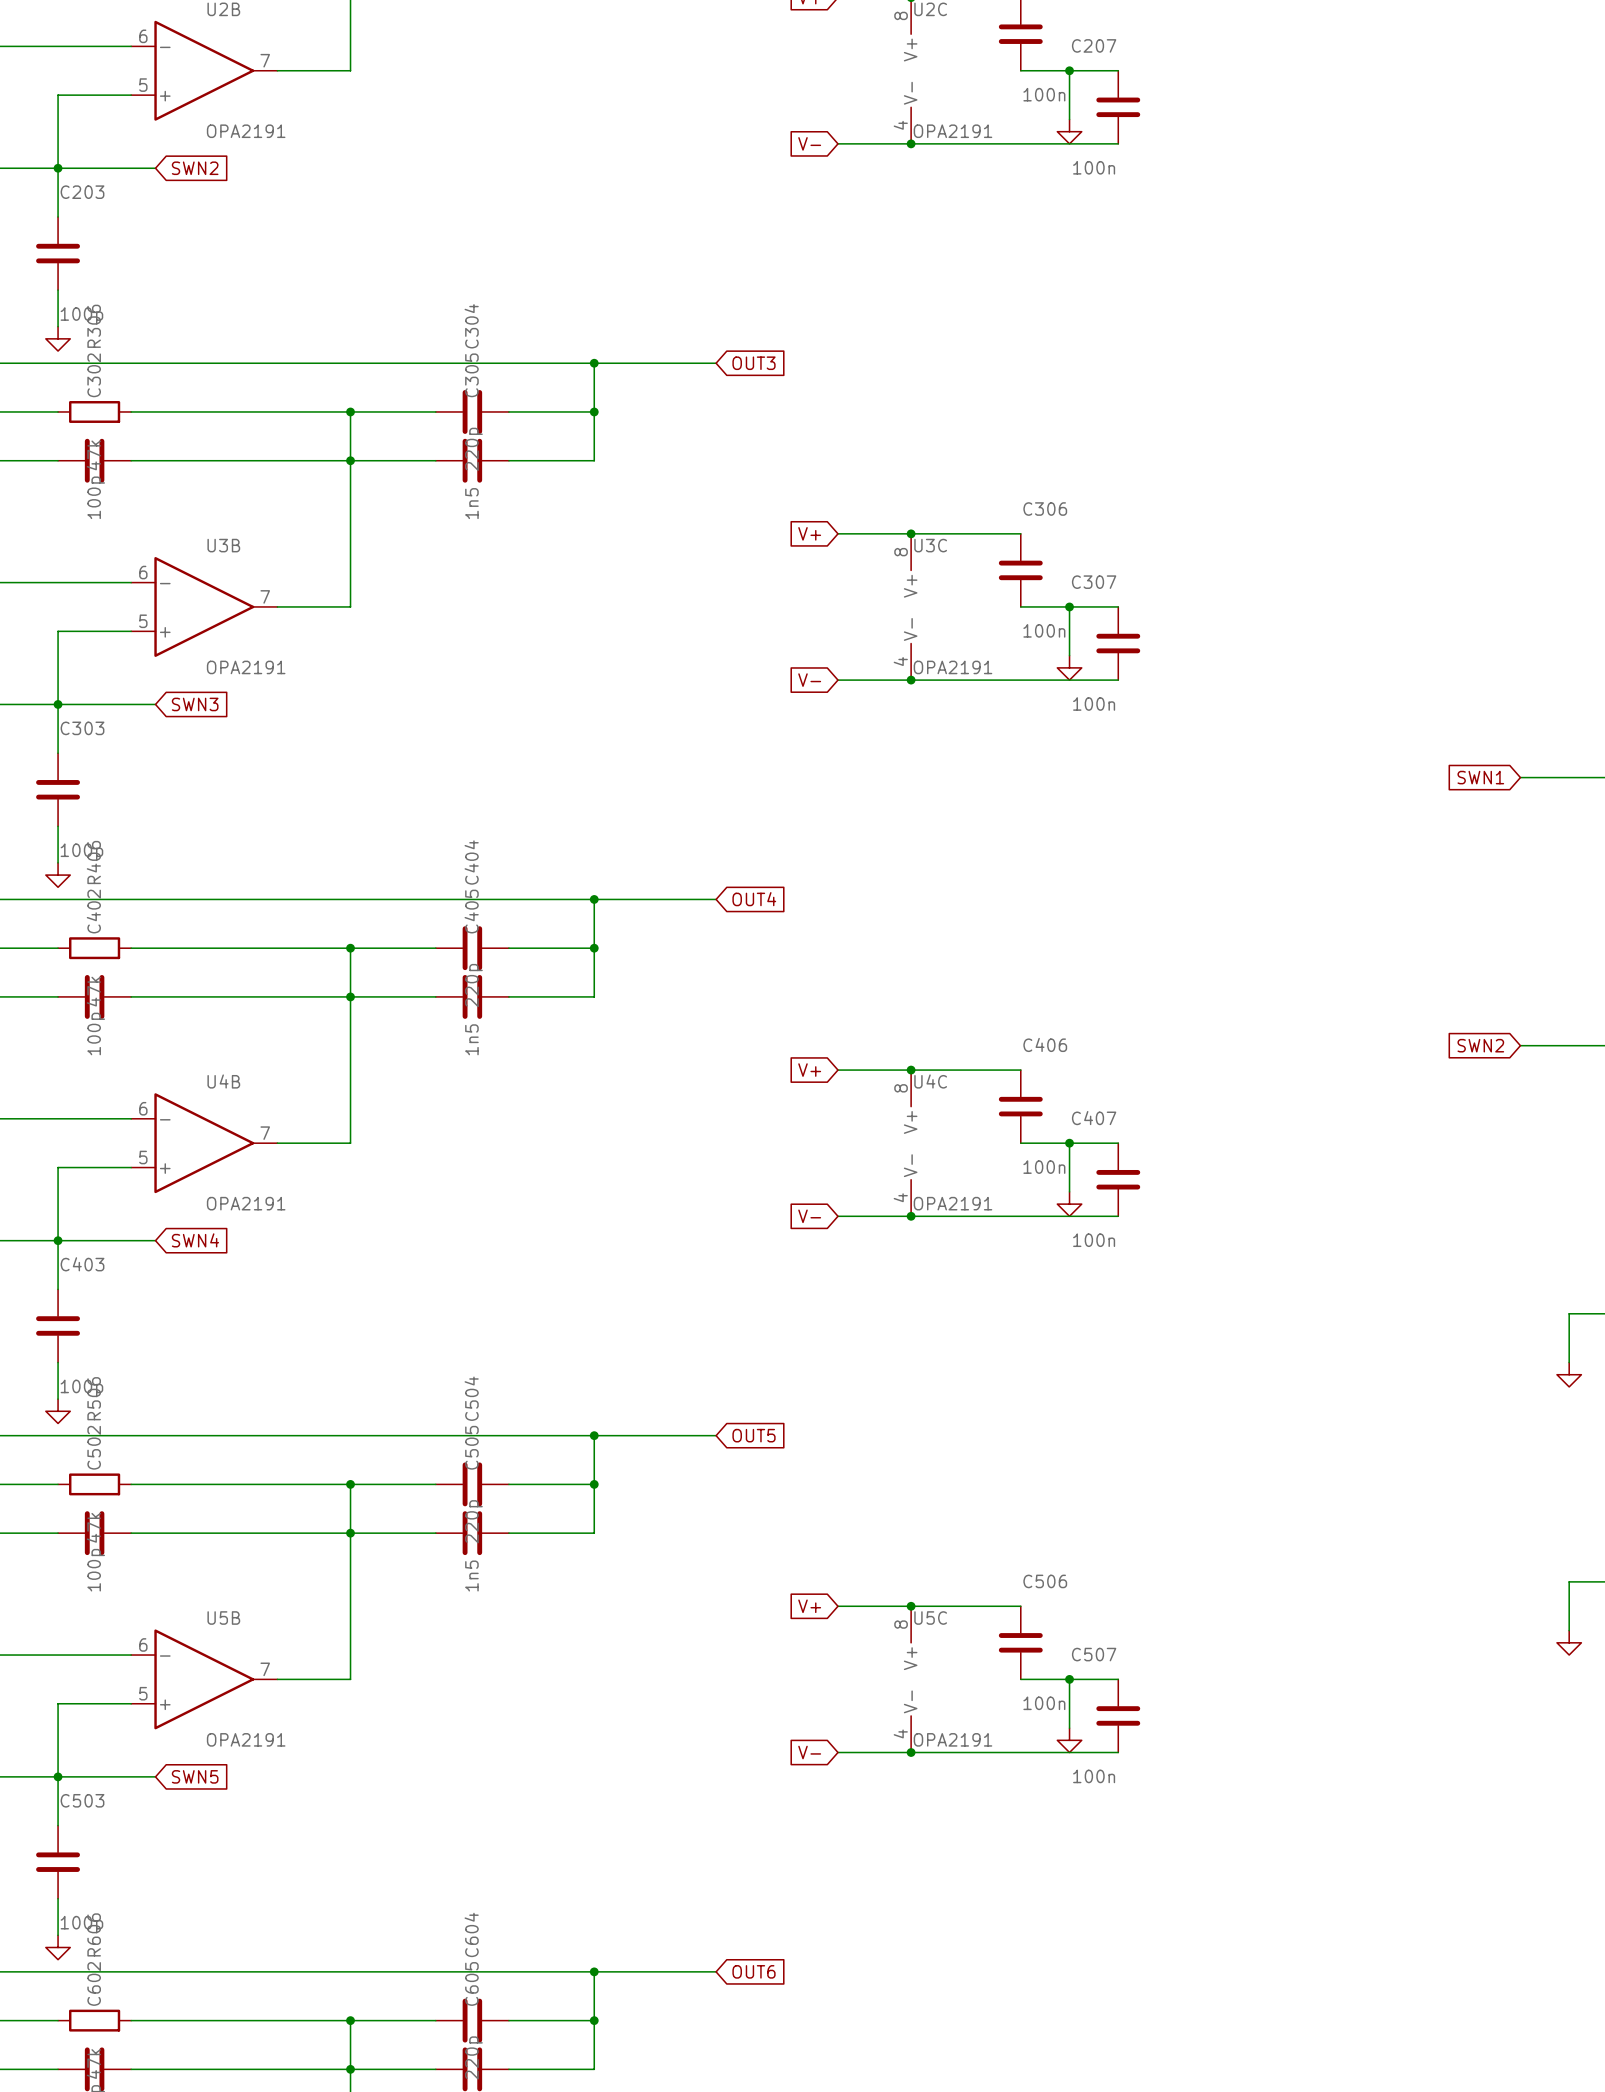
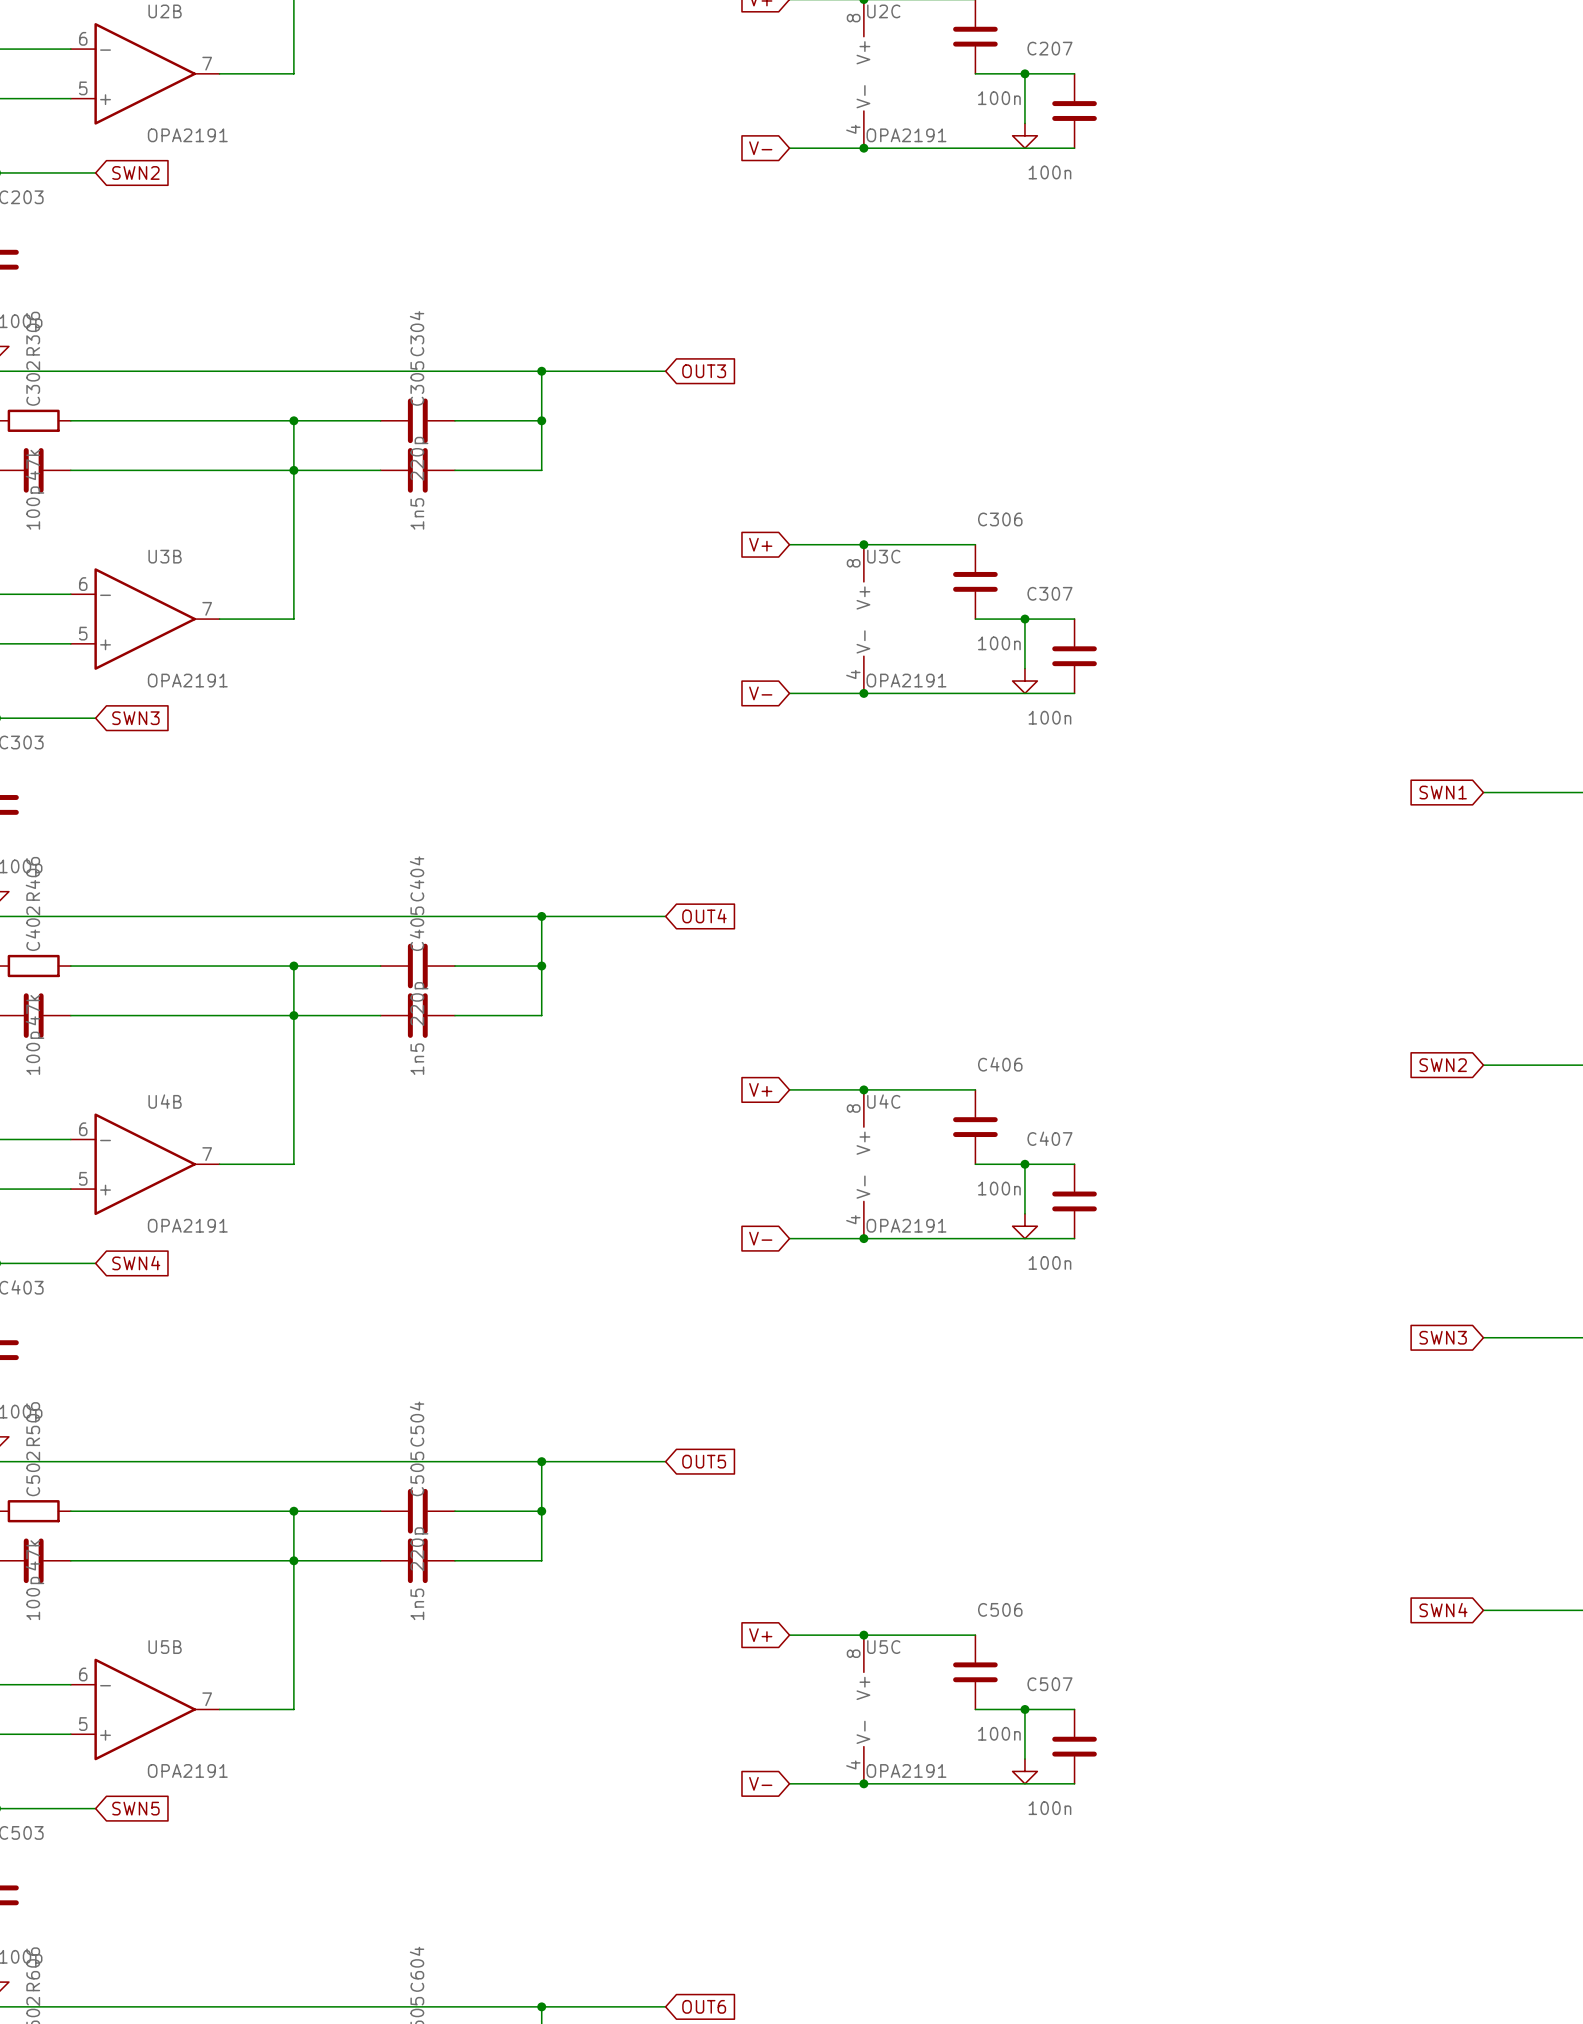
global label: none -> SWN3 (1443, 1337)
wire: (1569, 1313) (1569, 1362) -> (1533, 1337) (1483, 1337)
power symbol: (1569, 1374) -> none
global label: none -> SWN4 (1443, 1610)
wire: (1569, 1581) (1569, 1630) -> (1533, 1610) (1483, 1610)
power symbol: (1569, 1642) -> none

